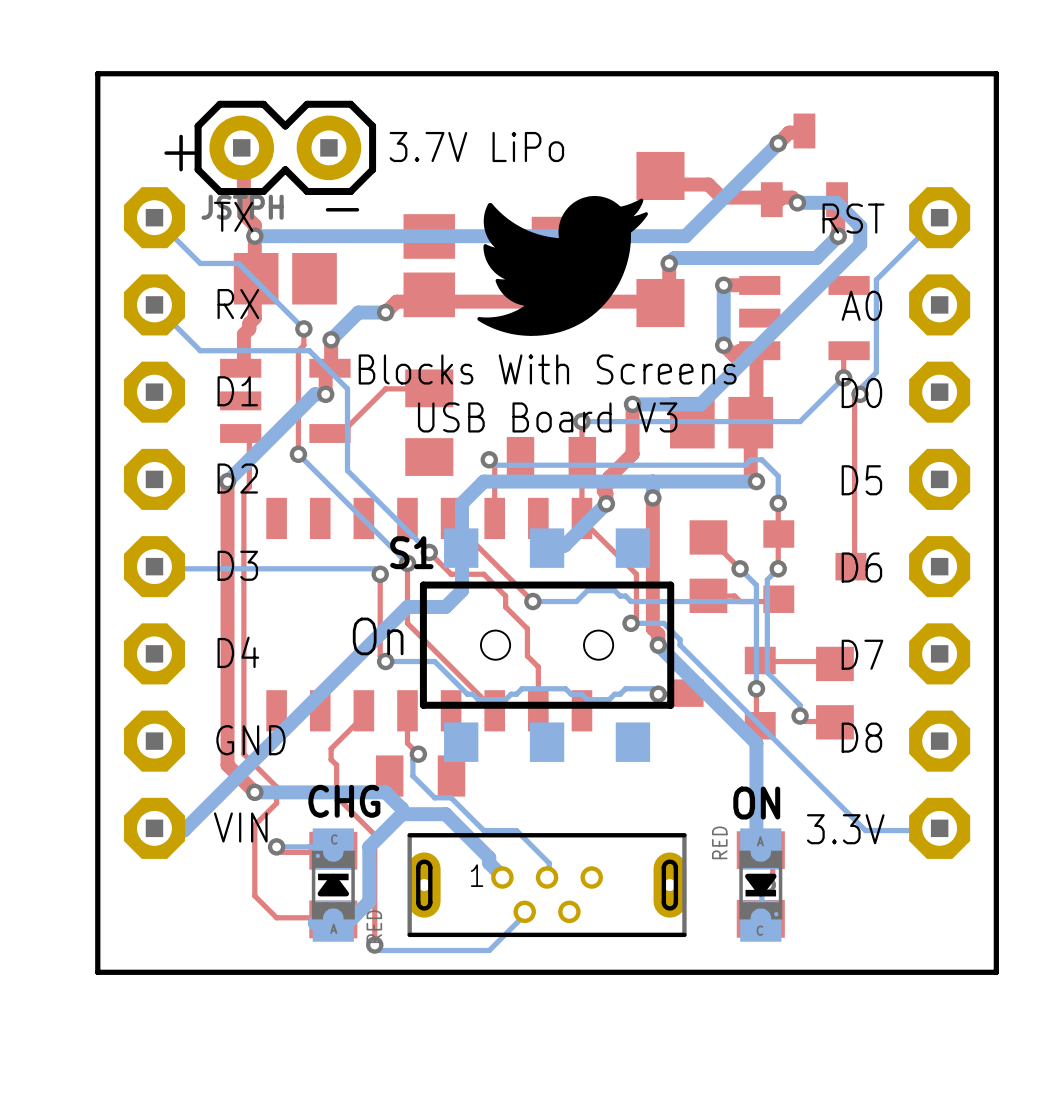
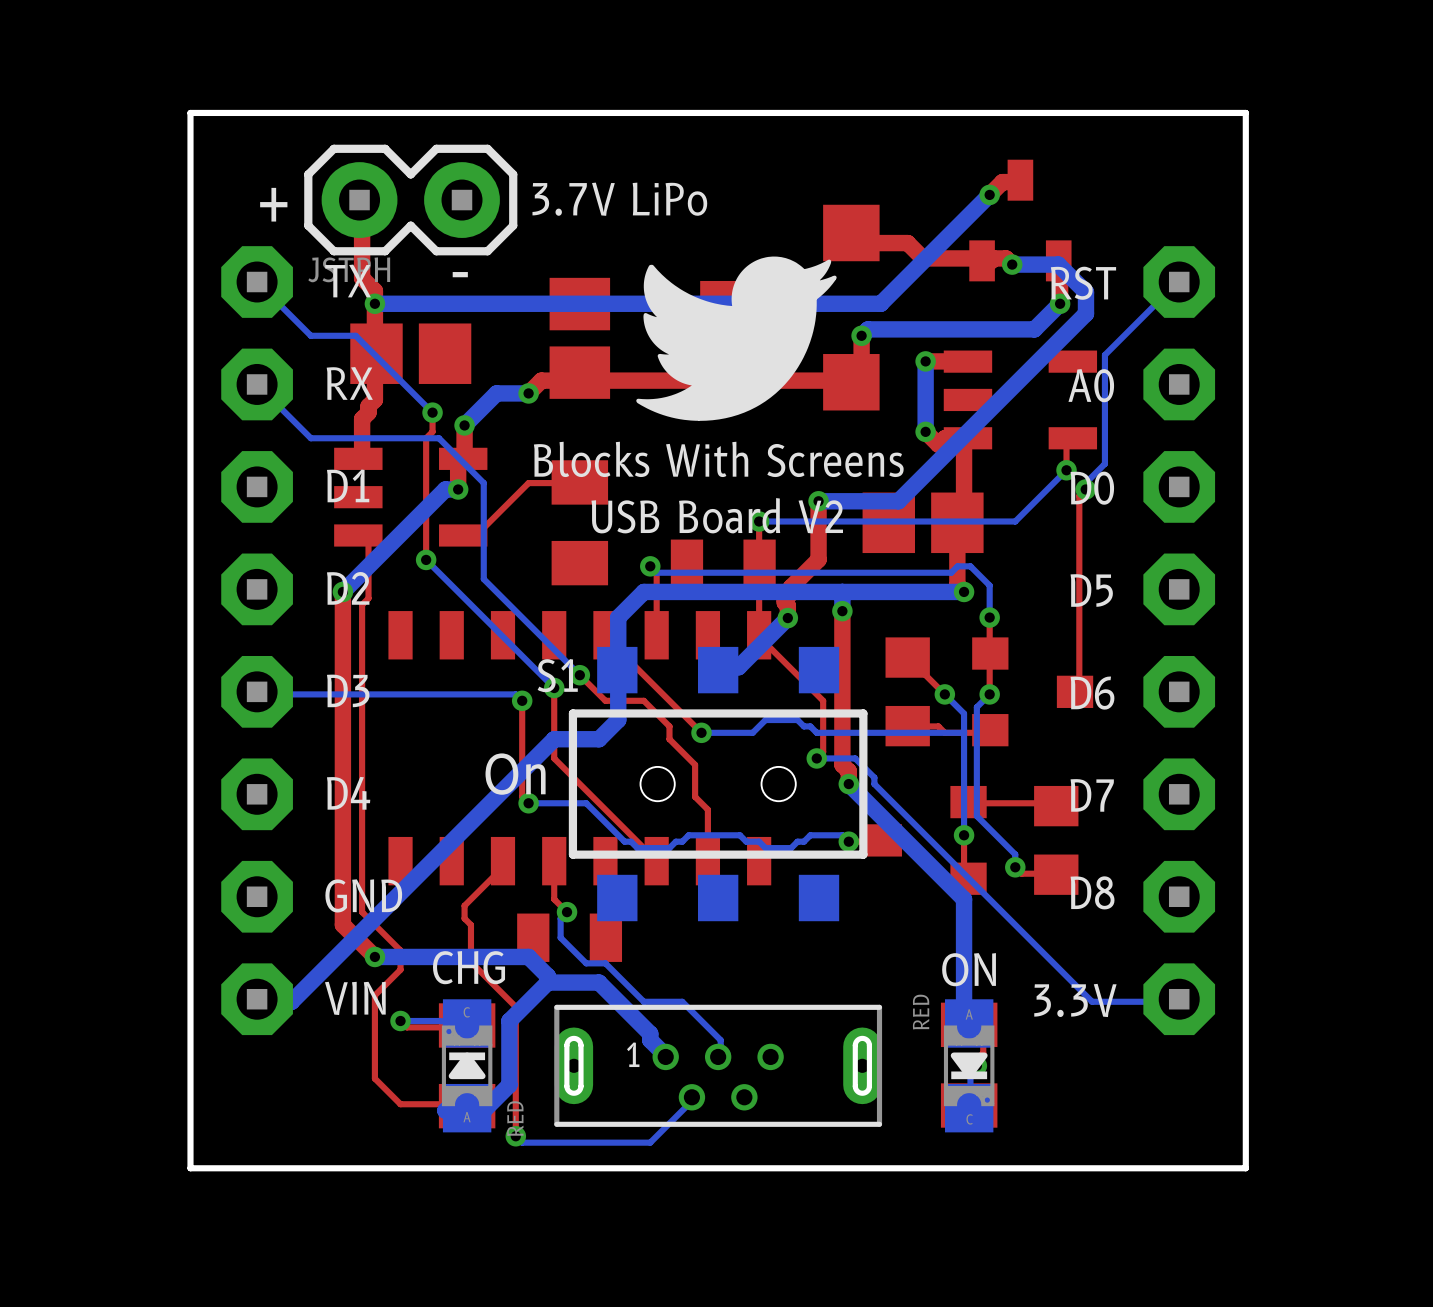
text: USB Board V3 (547, 417) -> USB Board V2 (717, 515)

